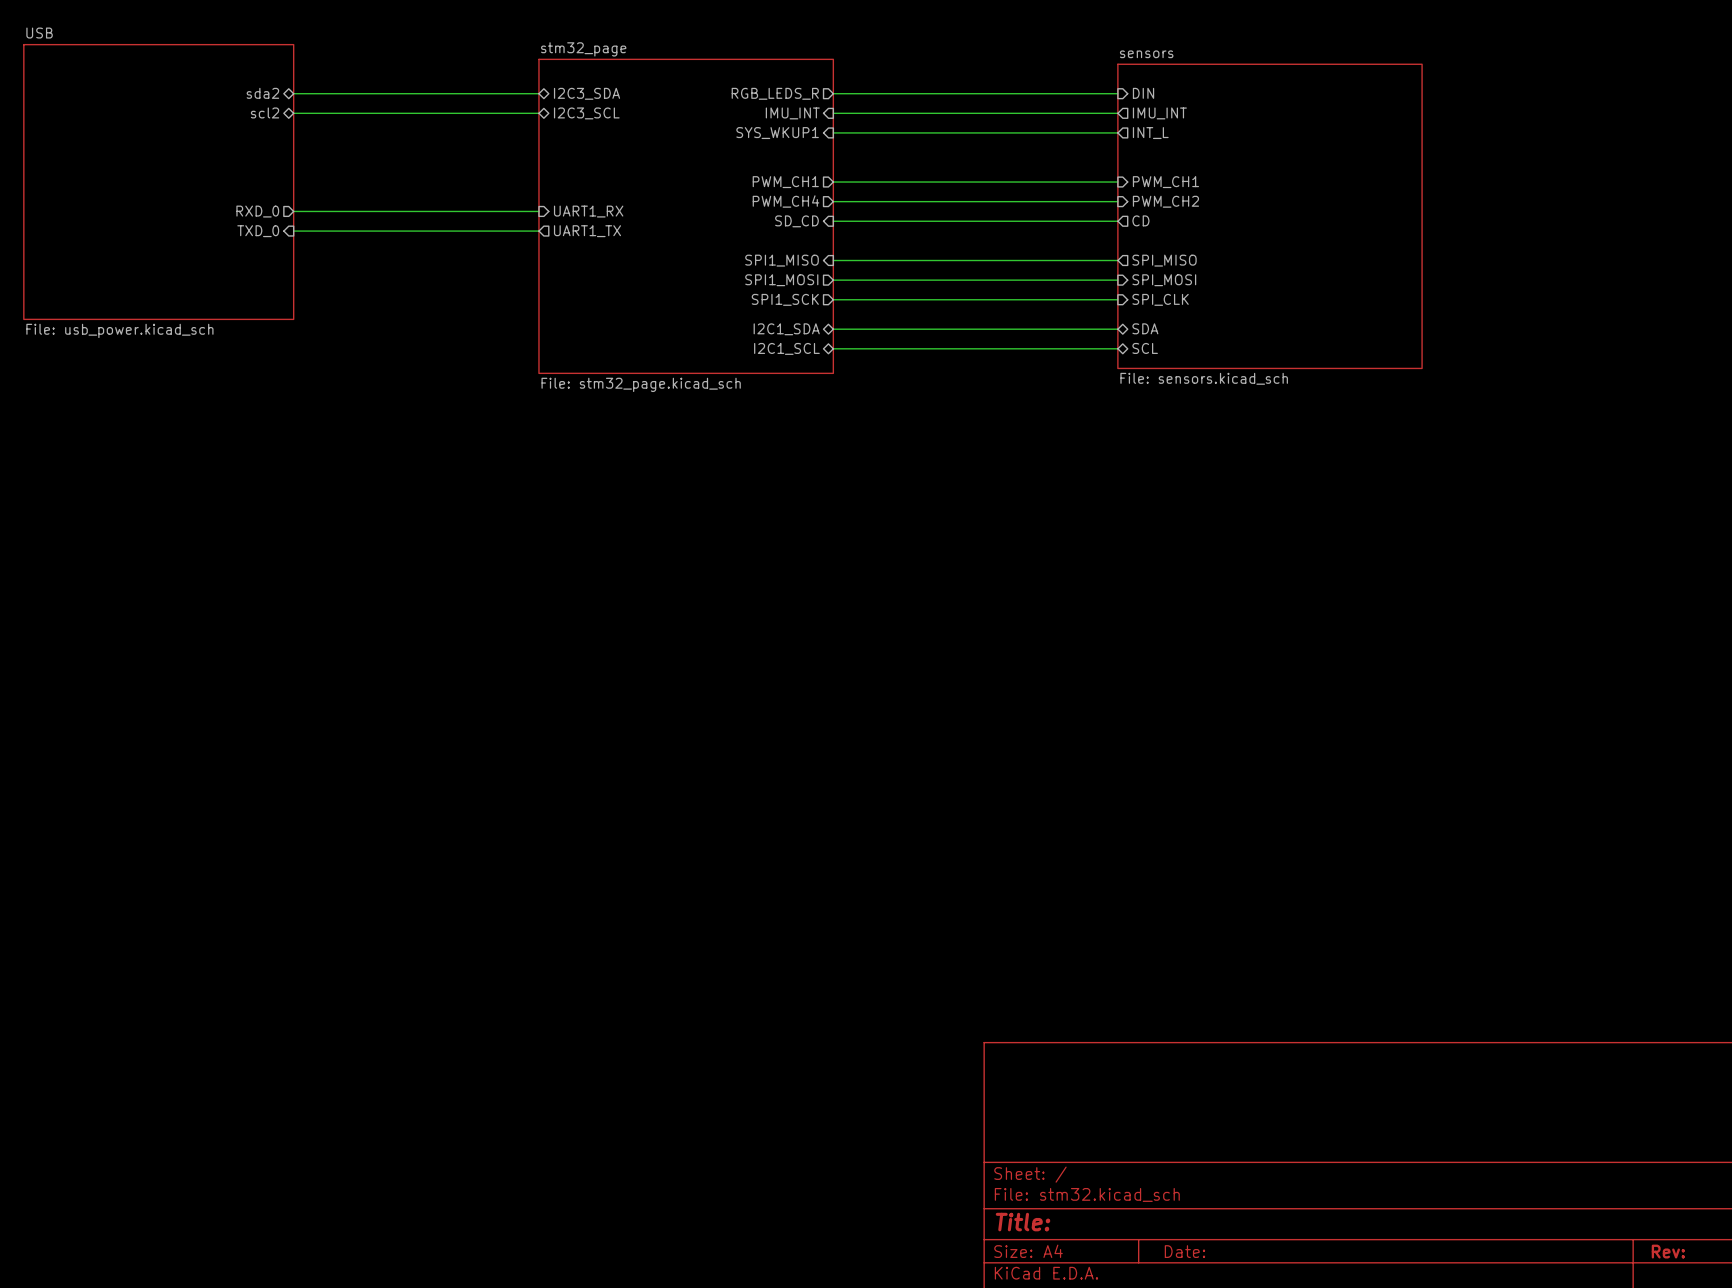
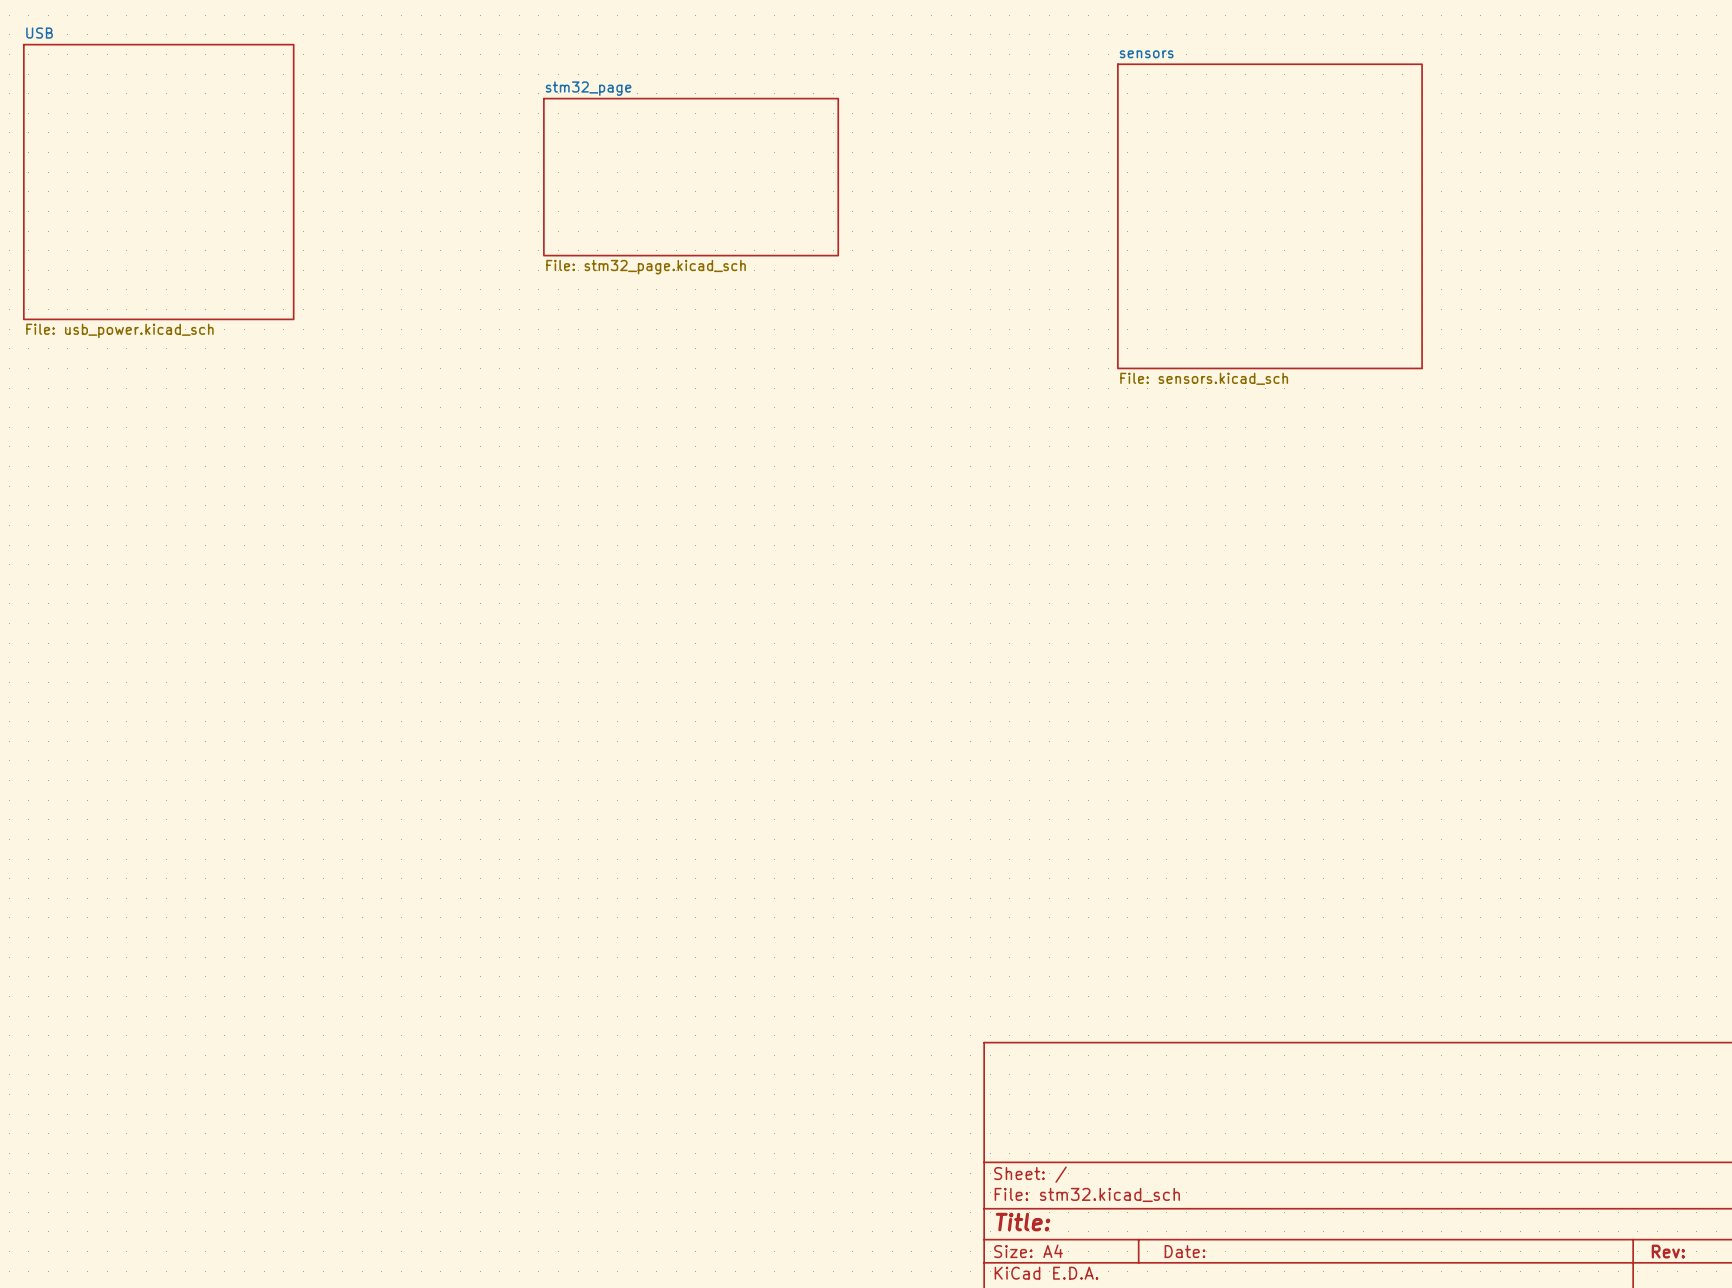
sheet stm32_page name position: stm32_page (583, 49) -> stm32_page (588, 88)
sheet stm32_page shape: [538, 58, 834, 374] -> [543, 98, 839, 257]
sheet pin: sda2 (262, 93) -> none
wire: (293, 93) (538, 93) -> none
sheet pin: I2C3_SDA (587, 93) -> none
sheet pin: RGB_LEDS_R (775, 93) -> none
wire: (833, 93) (1117, 93) -> none
sheet pin: DIN (1143, 93) -> none
sheet pin: scl2 (265, 112) -> none
wire: (293, 113) (538, 113) -> none
sheet pin: I2C3_SCL (586, 113) -> none
sheet pin: IMU_INT (792, 113) -> none
wire: (833, 113) (1117, 113) -> none
sheet pin: IMU_INT (1159, 113) -> none
wire: (833, 132) (1117, 132) -> none
sheet pin: SYS_WKUP1 (777, 133) -> none
sheet pin: INT_L (1150, 133) -> none
sheet pin: PWM_CH1 (785, 182) -> none
wire: (833, 182) (1117, 182) -> none
sheet pin: PWM_CH1 (1165, 182) -> none
sheet pin: PWM_CH4 (785, 201) -> none
wire: (833, 201) (1117, 201) -> none
sheet pin: PWM_CH2 (1165, 201) -> none
sheet pin: RXD_0 (257, 211) -> none
wire: (293, 211) (538, 211) -> none
sheet pin: UART1_RX (588, 211) -> none
sheet pin: CD (1140, 220) -> none
sheet pin: SD_CD (796, 221) -> none
wire: (833, 221) (1117, 221) -> none
sheet pin: TXD_0 (258, 231) -> none
wire: (293, 231) (538, 231) -> none
sheet pin: UART1_TX (587, 231) -> none
sheet pin: SPI1_MISO (782, 260) -> none
wire: (833, 260) (1117, 260) -> none
sheet pin: SPI_MISO (1164, 260) -> none
sheet pin: SPI1_MOSI (781, 280) -> none
wire: (833, 280) (1117, 280) -> none
sheet pin: SPI_MOSI (1164, 280) -> none
sheet pin: SPI1_SCK (785, 299) -> none
wire: (833, 299) (1117, 299) -> none
sheet pin: SPI_CLK (1160, 299) -> none
sheet pin: SDA (1145, 328) -> none
sheet pin: I2C1_SDA (786, 329) -> none
wire: (833, 329) (1117, 329) -> none
sheet pin: I2C1_SCL (786, 348) -> none
wire: (833, 348) (1117, 348) -> none
sheet pin: SCL (1145, 348) -> none
sheet stm32_page value position: File: stm32_page.kicad_sch (641, 384) -> File: stm32_page.kicad_sch (646, 267)

